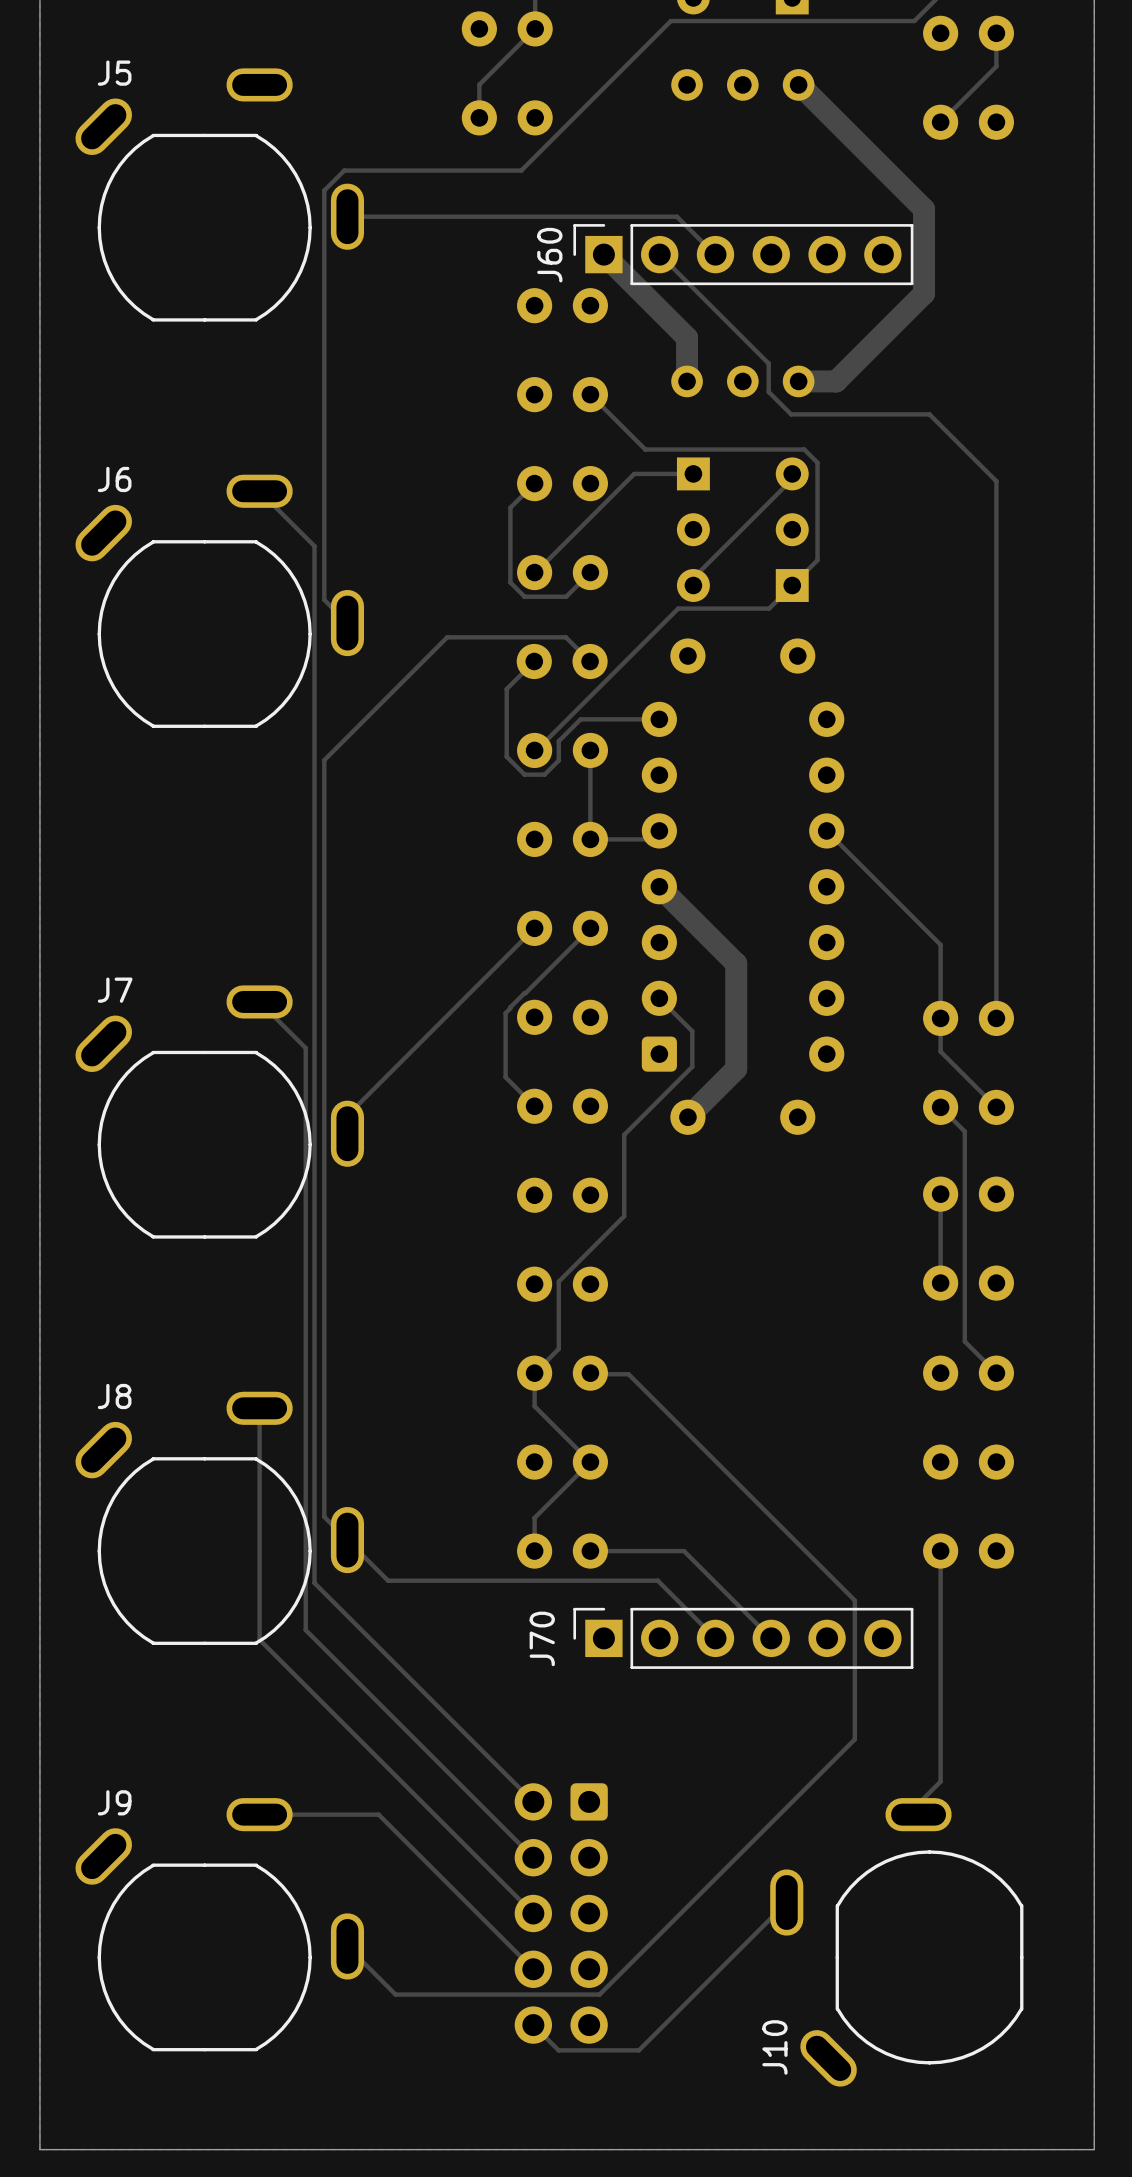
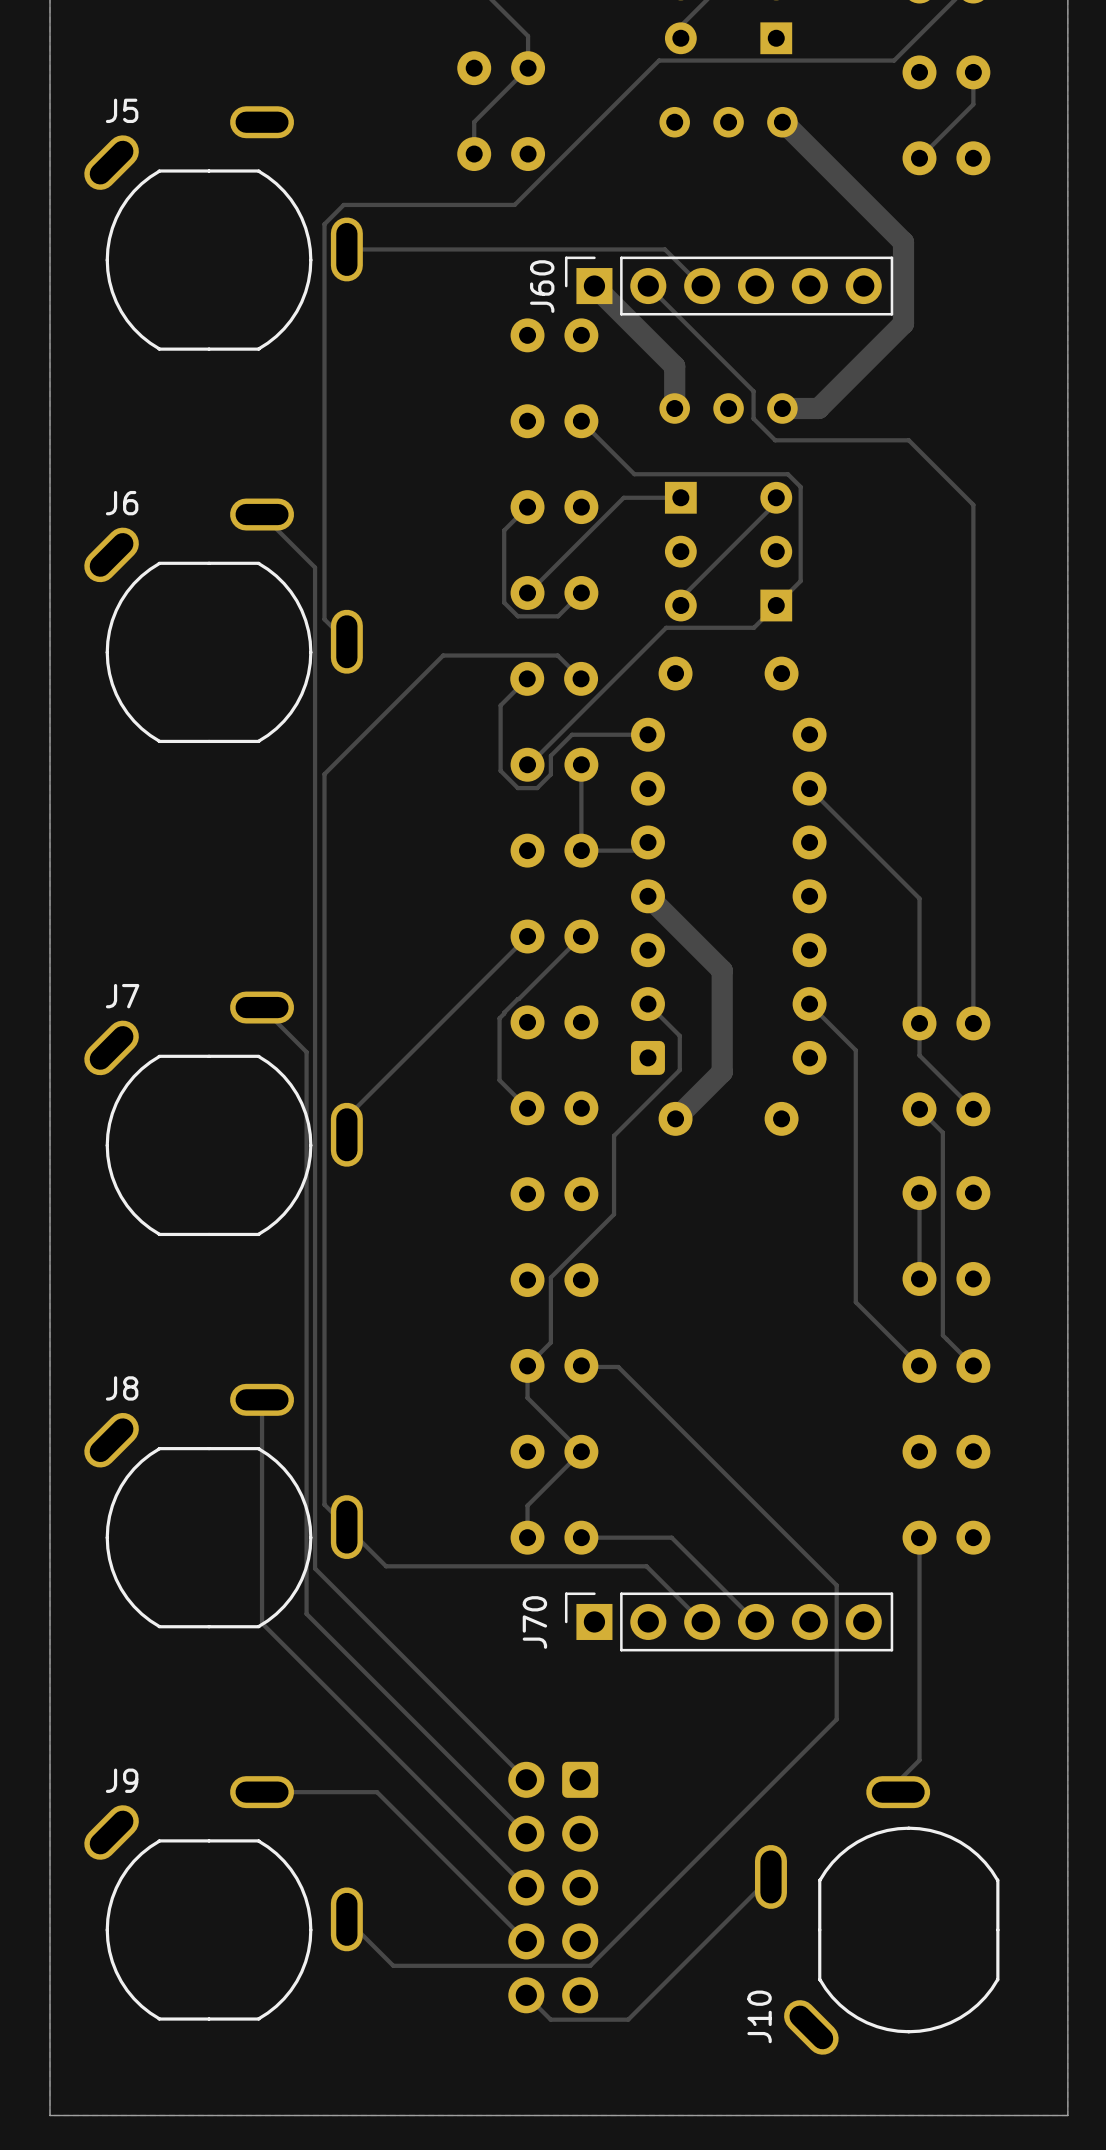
track: (826, 830) (940, 944) -> (809, 788) (919, 898) (919, 952)
track: none -> (809, 1004) (855, 1050) (855, 1302) (919, 1365)

